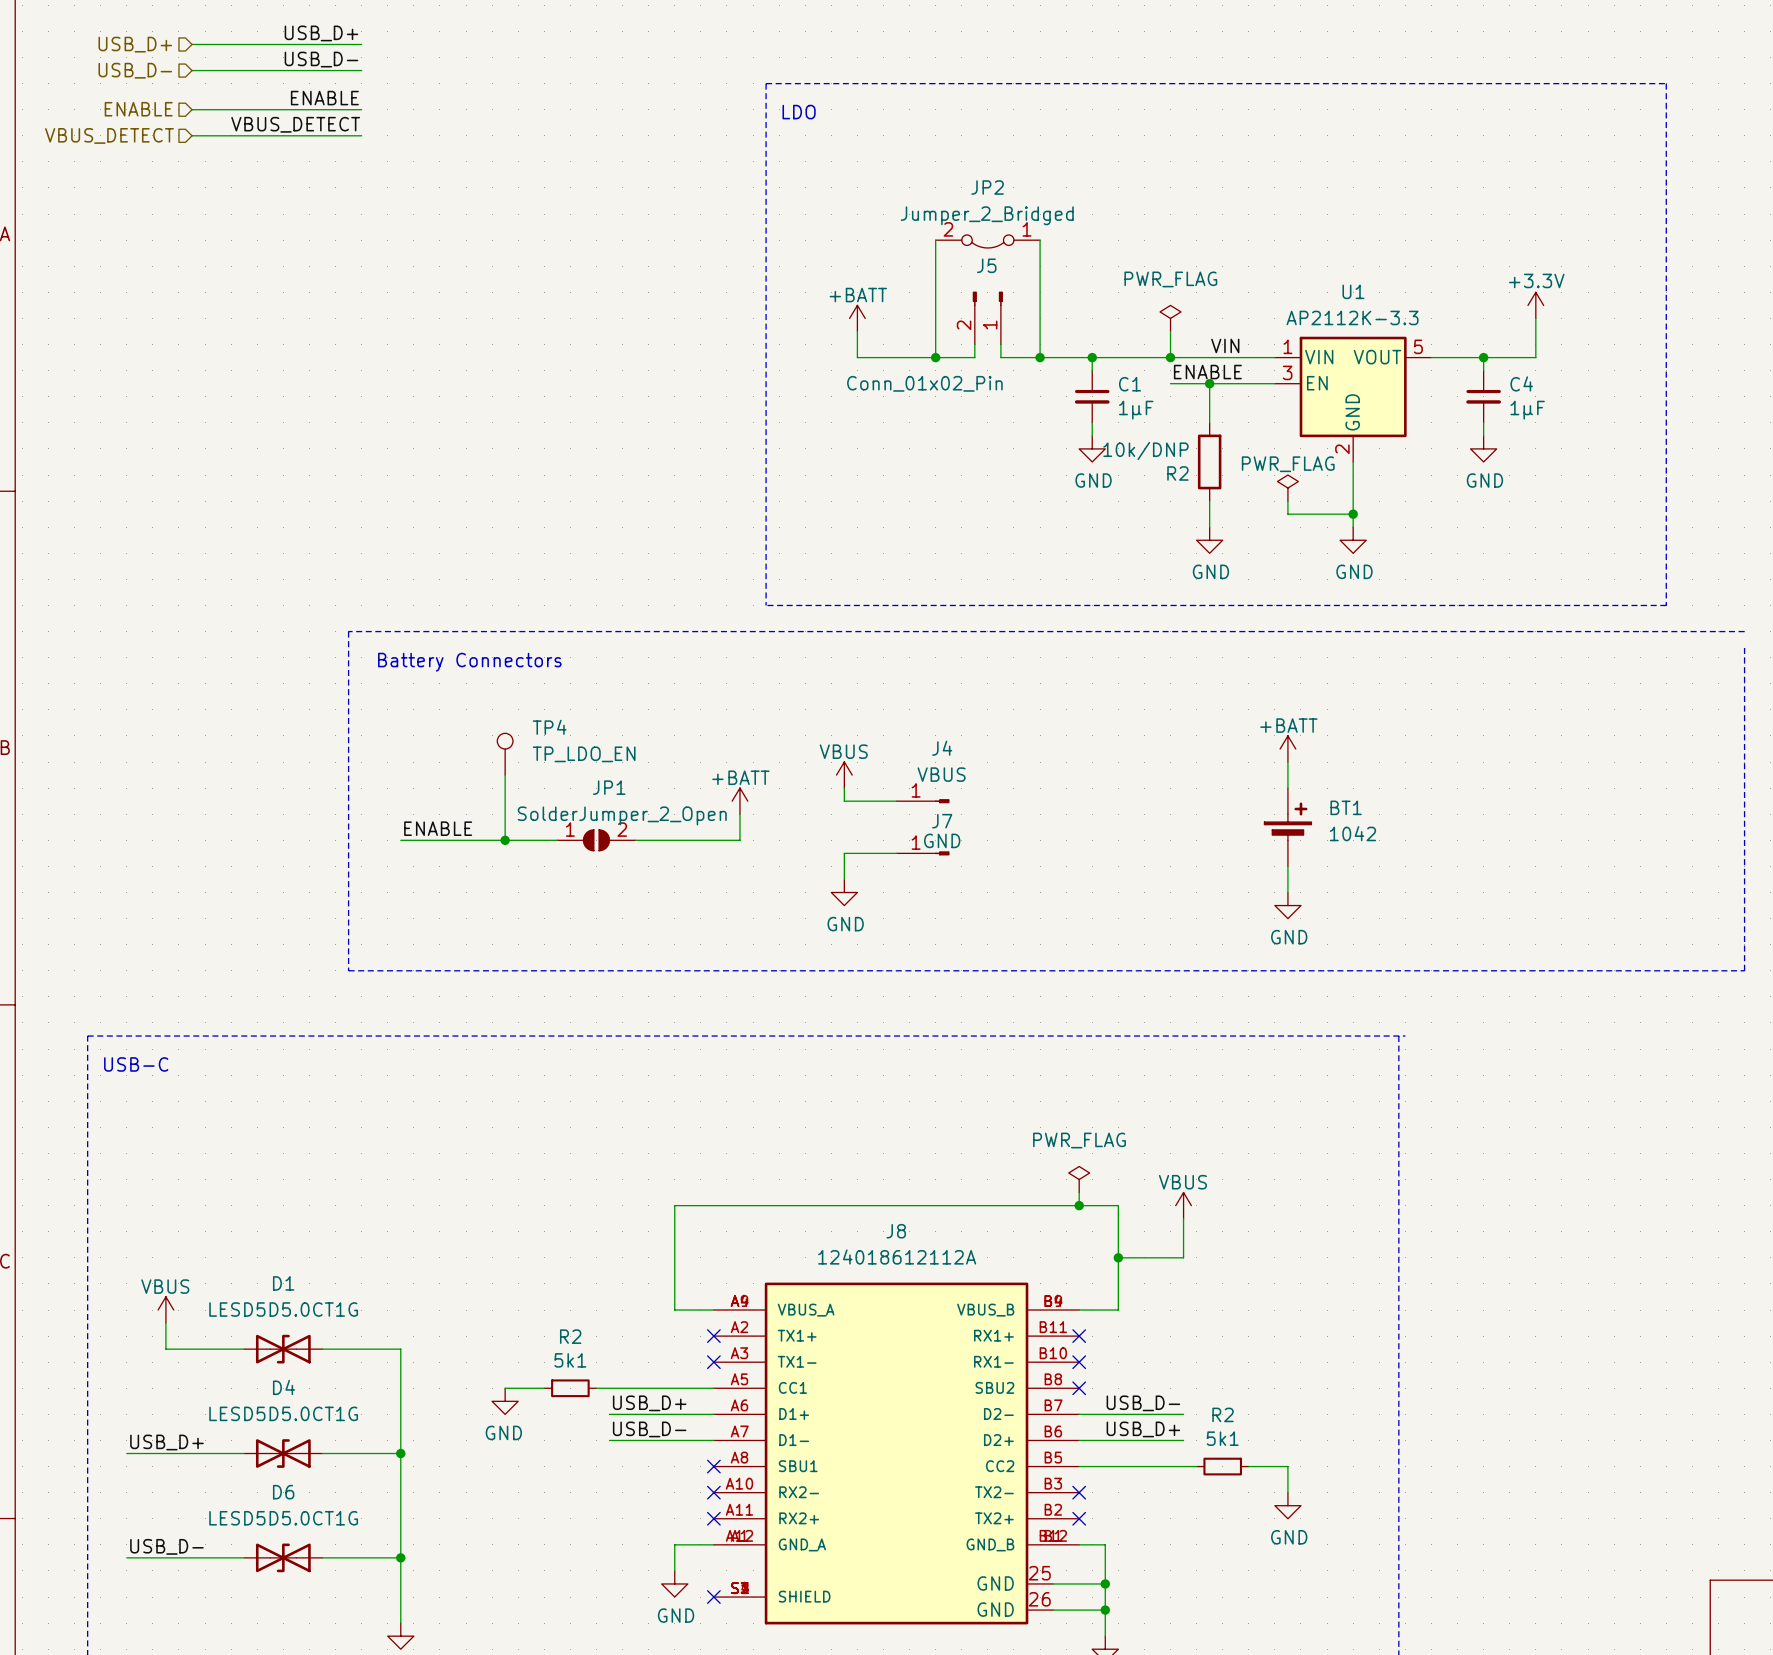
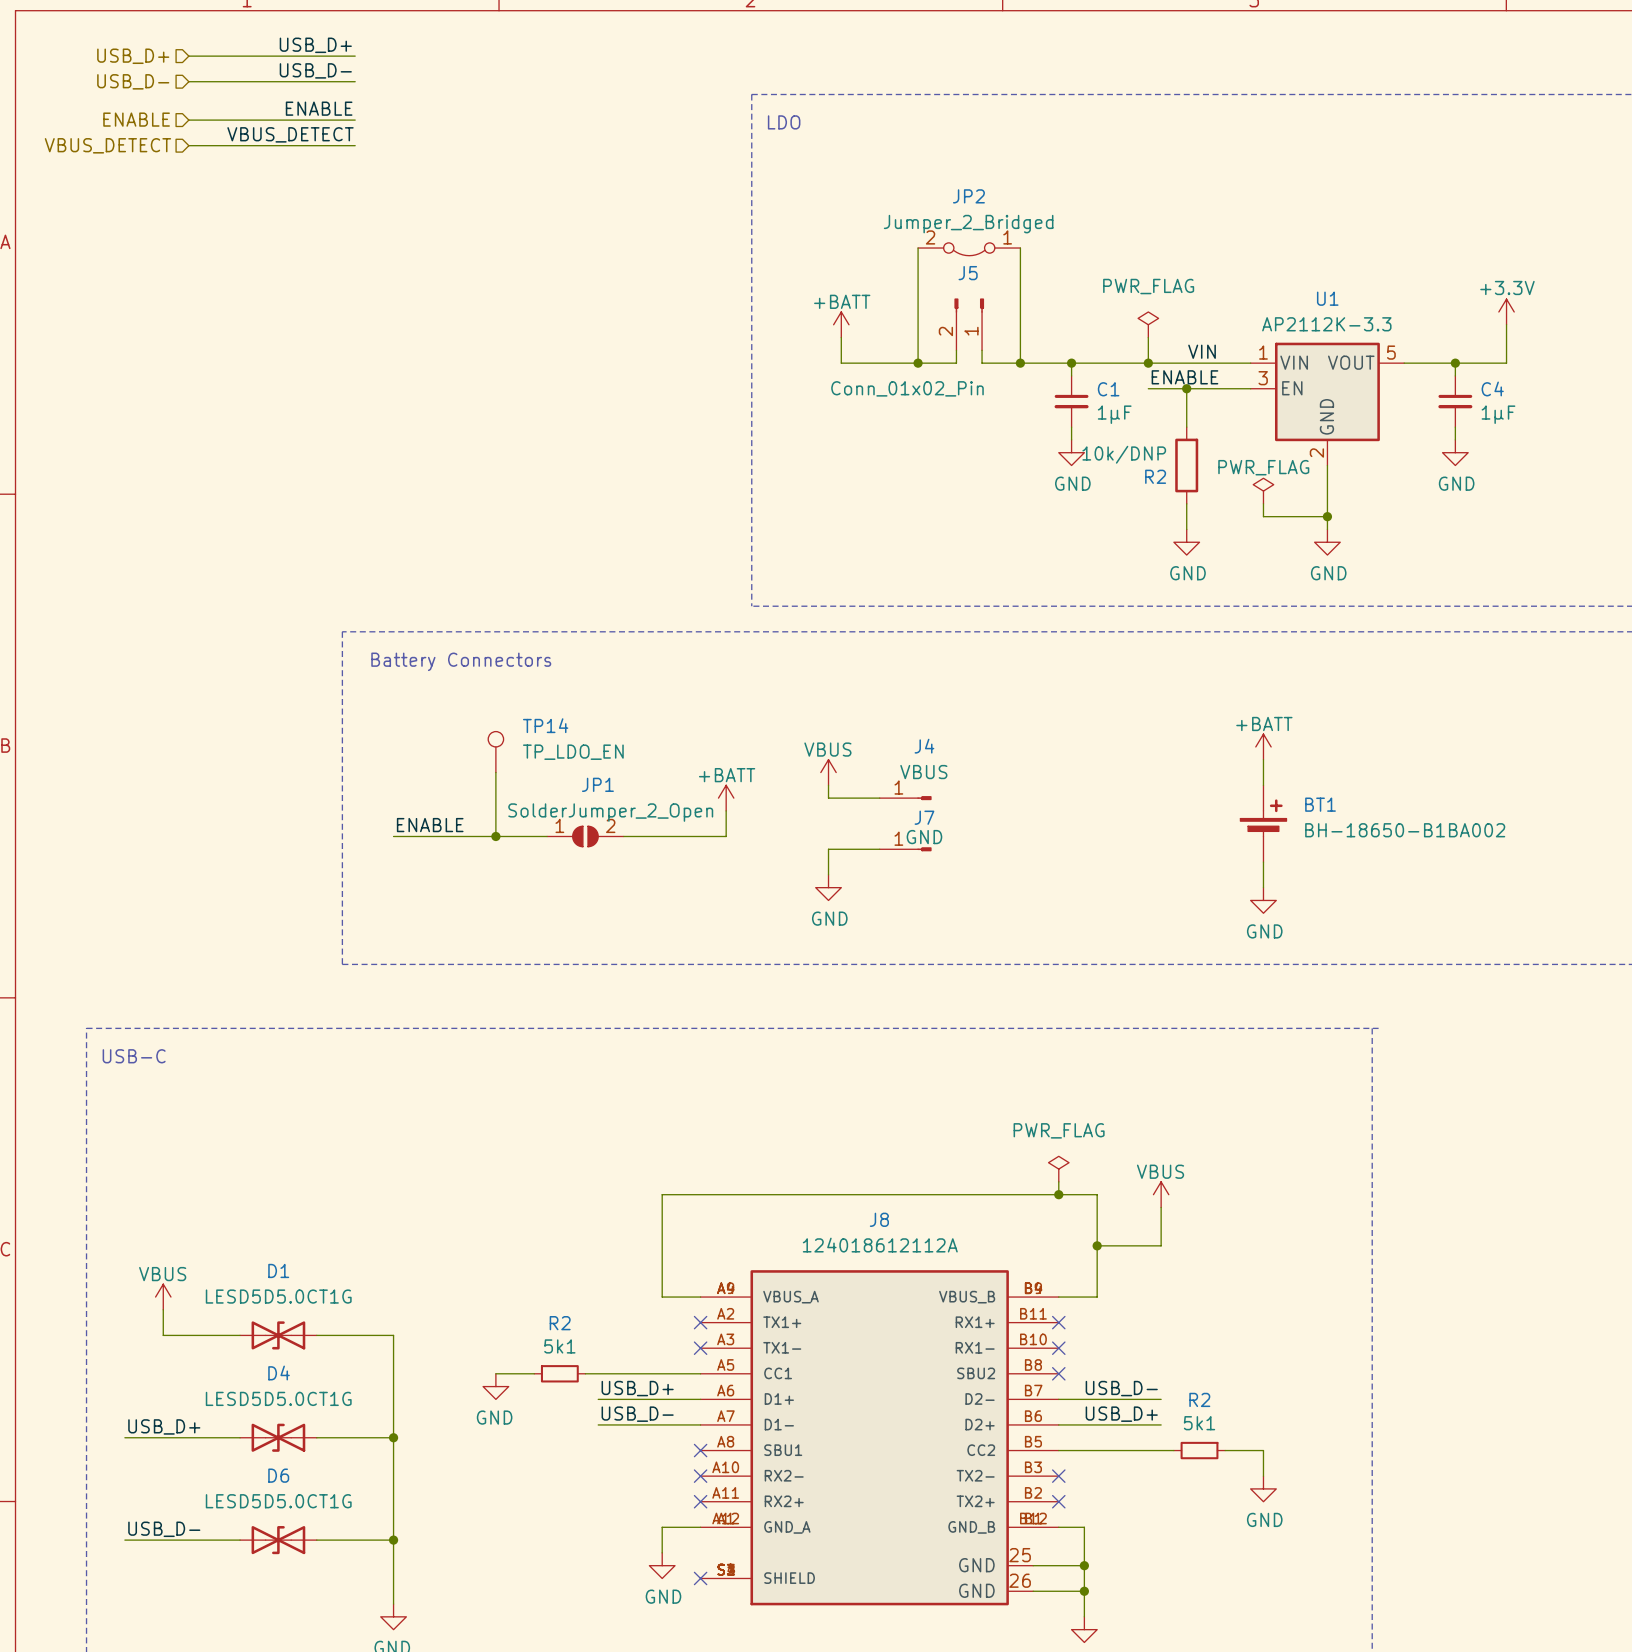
TP4 name: TP4 (549, 727) -> TP14 (545, 725)
BT1 value: 1042 (1352, 833) -> BH-18650-B1BA002 (1405, 830)

